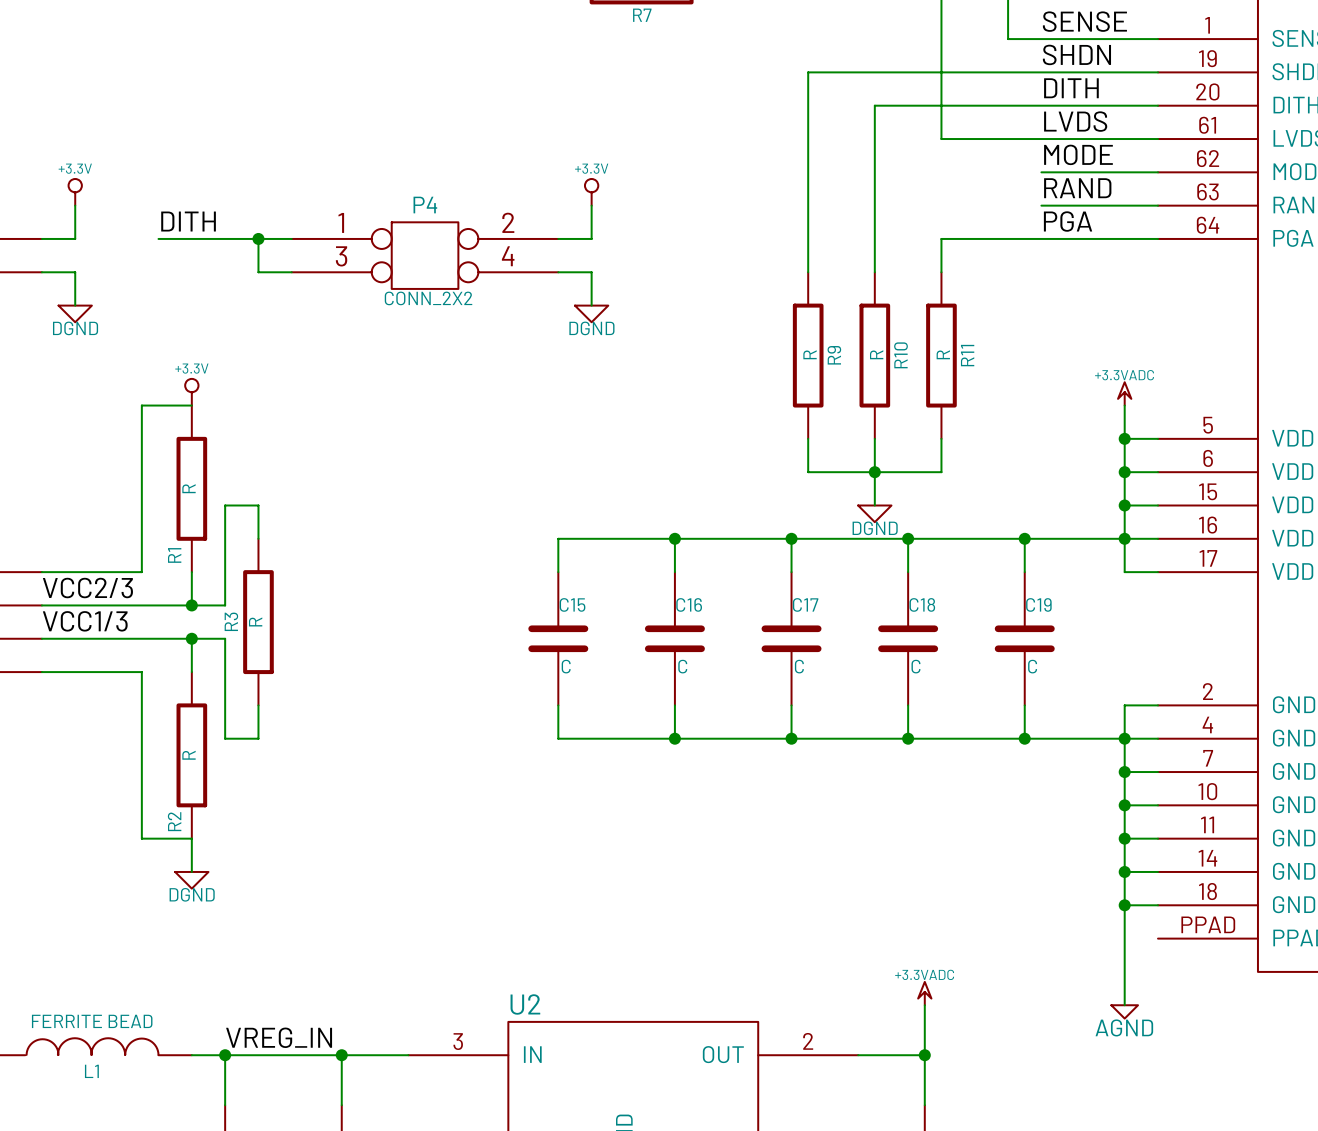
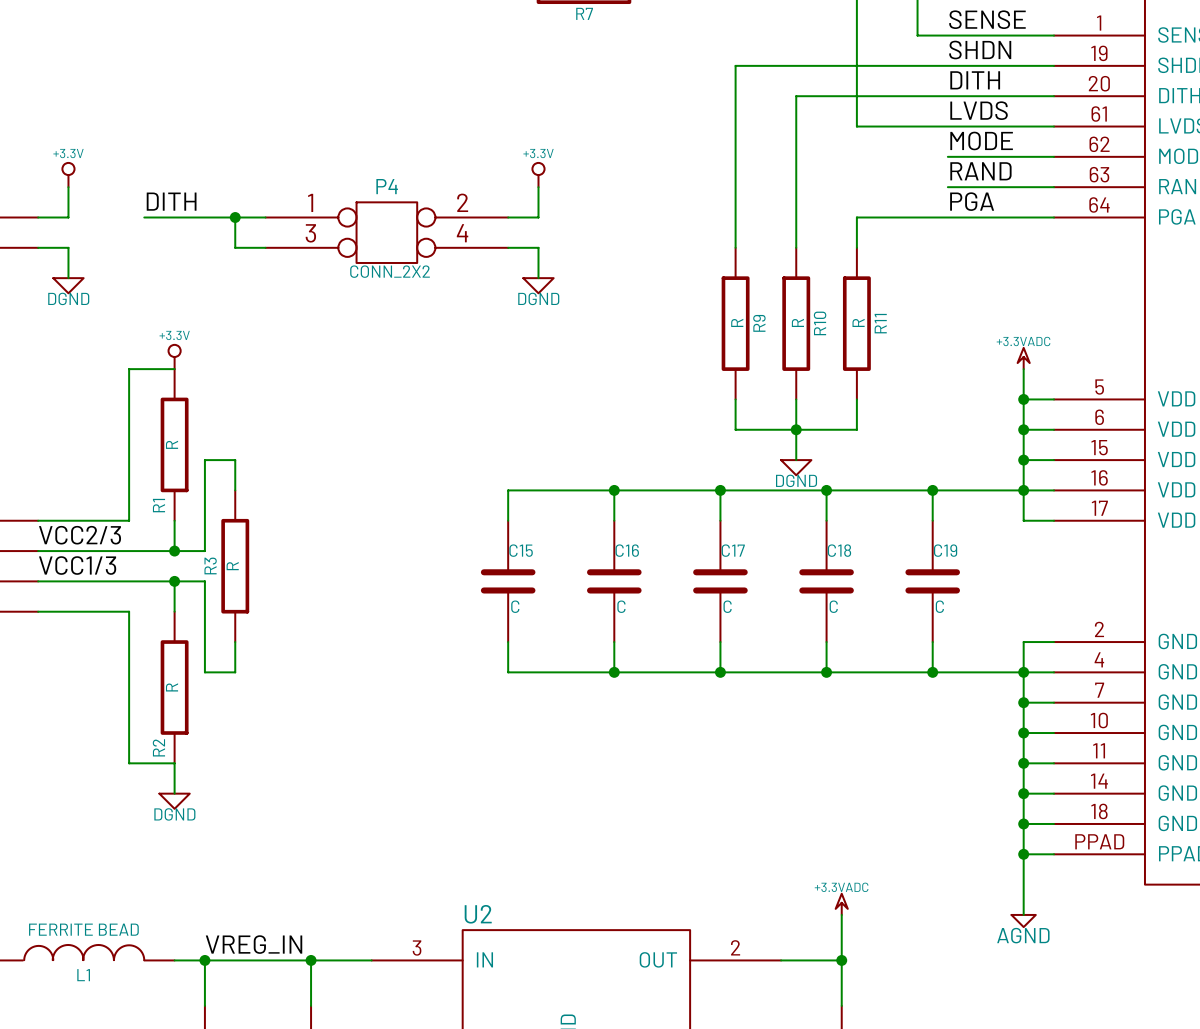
wire: none -> (1023, 854) (1054, 854)
junction: none -> (1023, 854)

